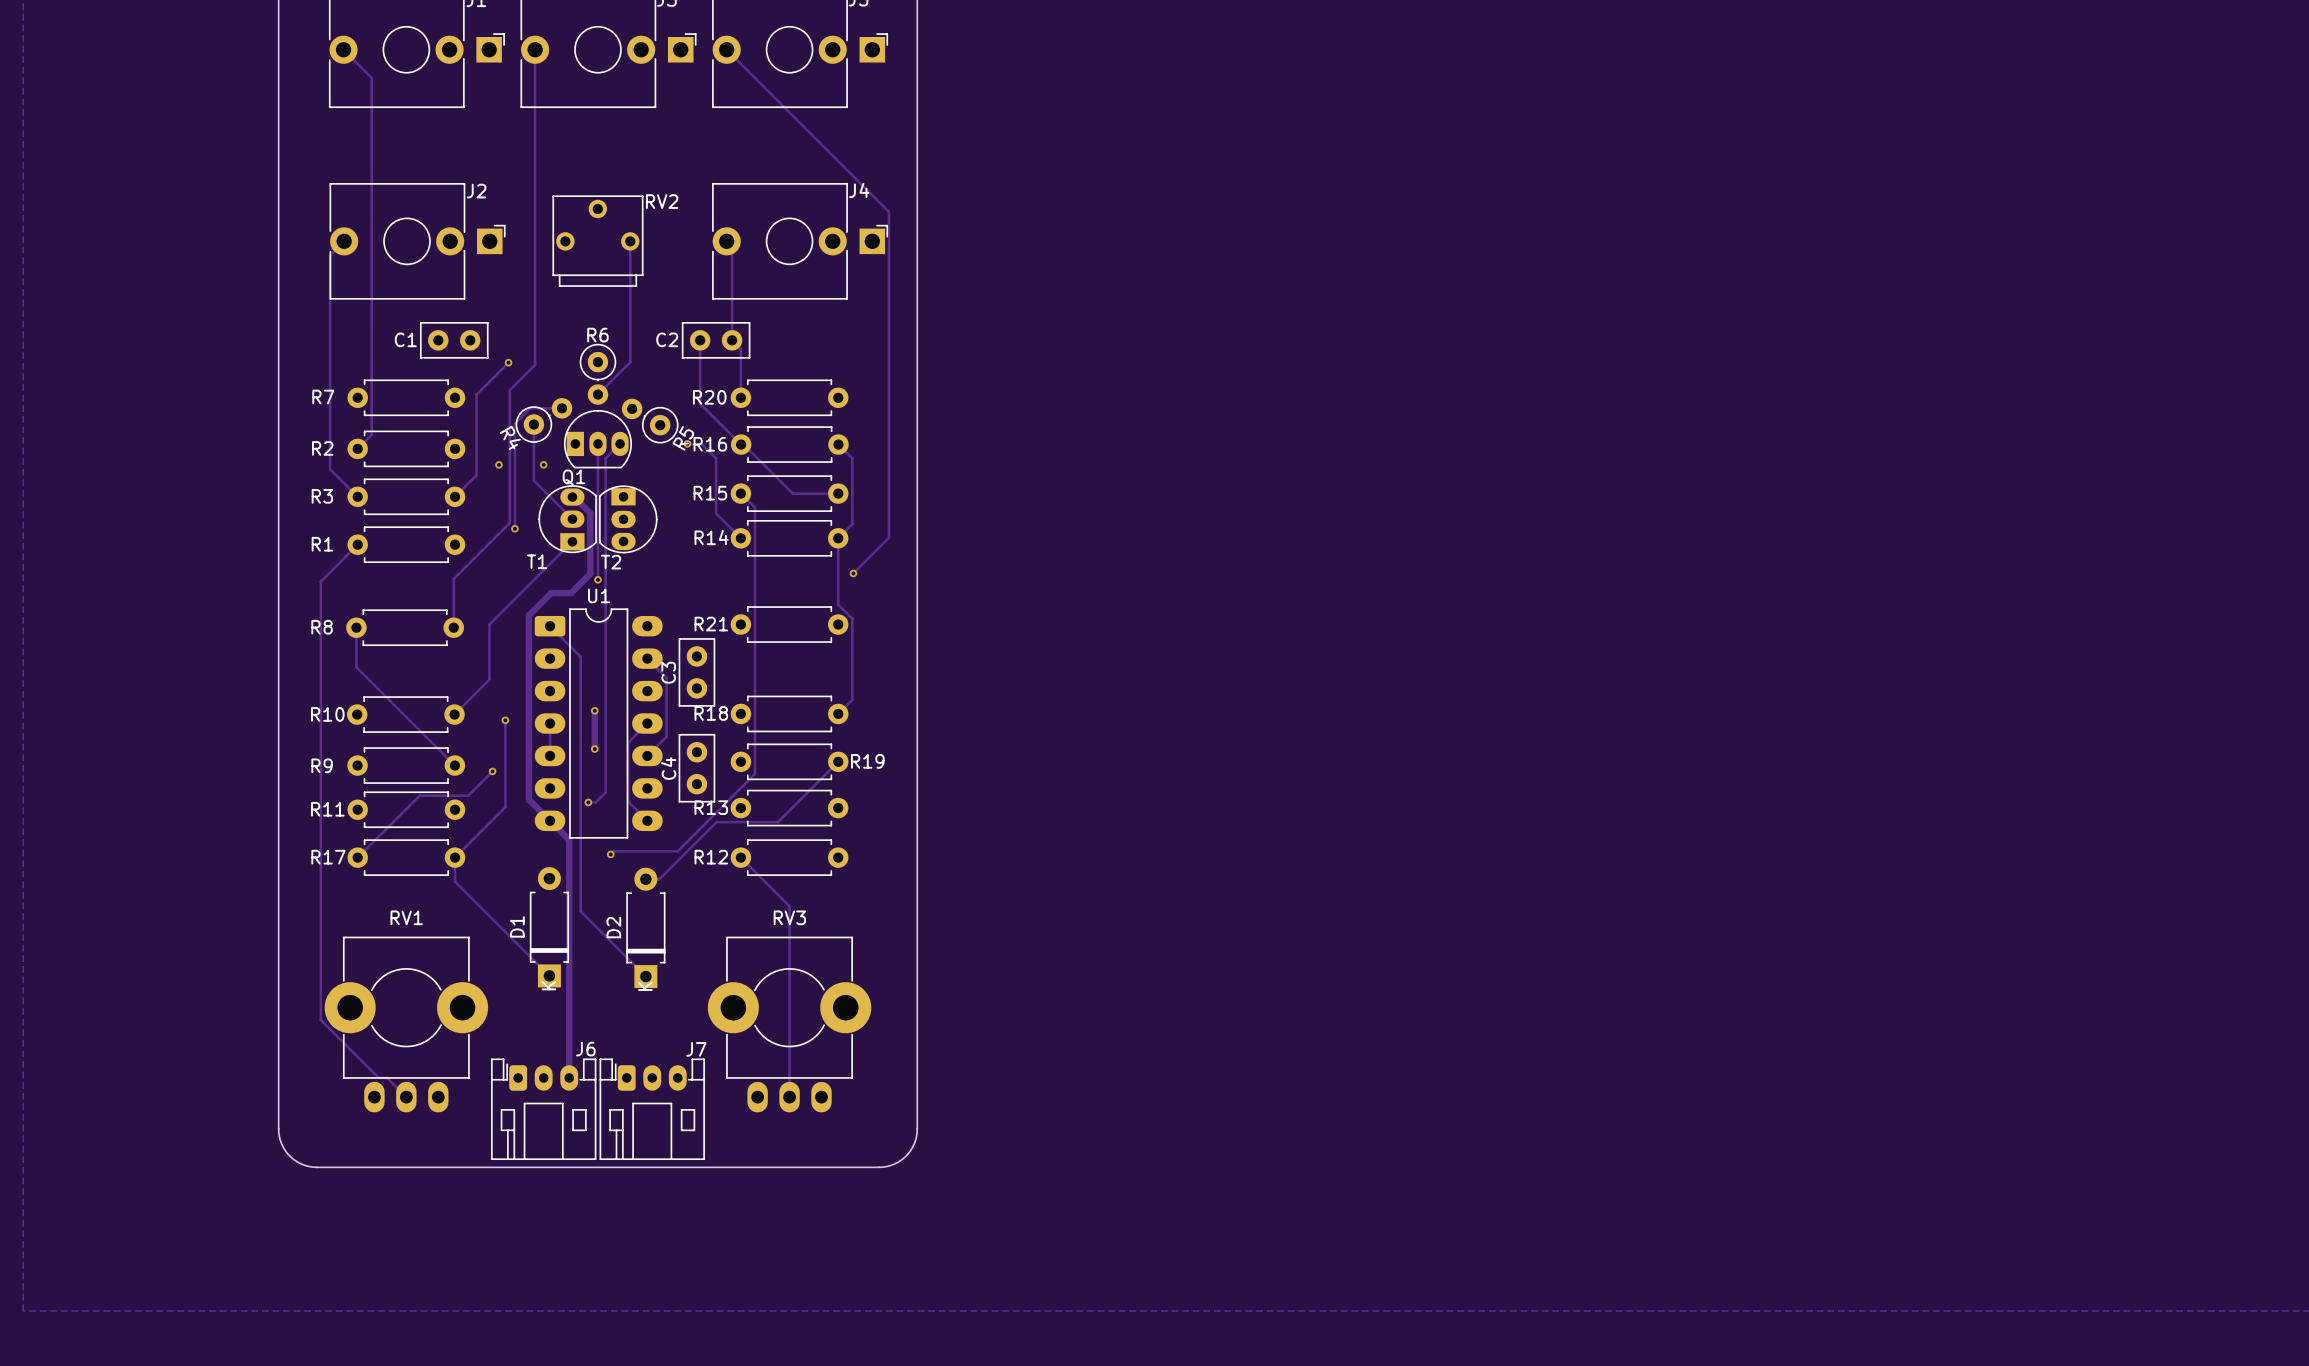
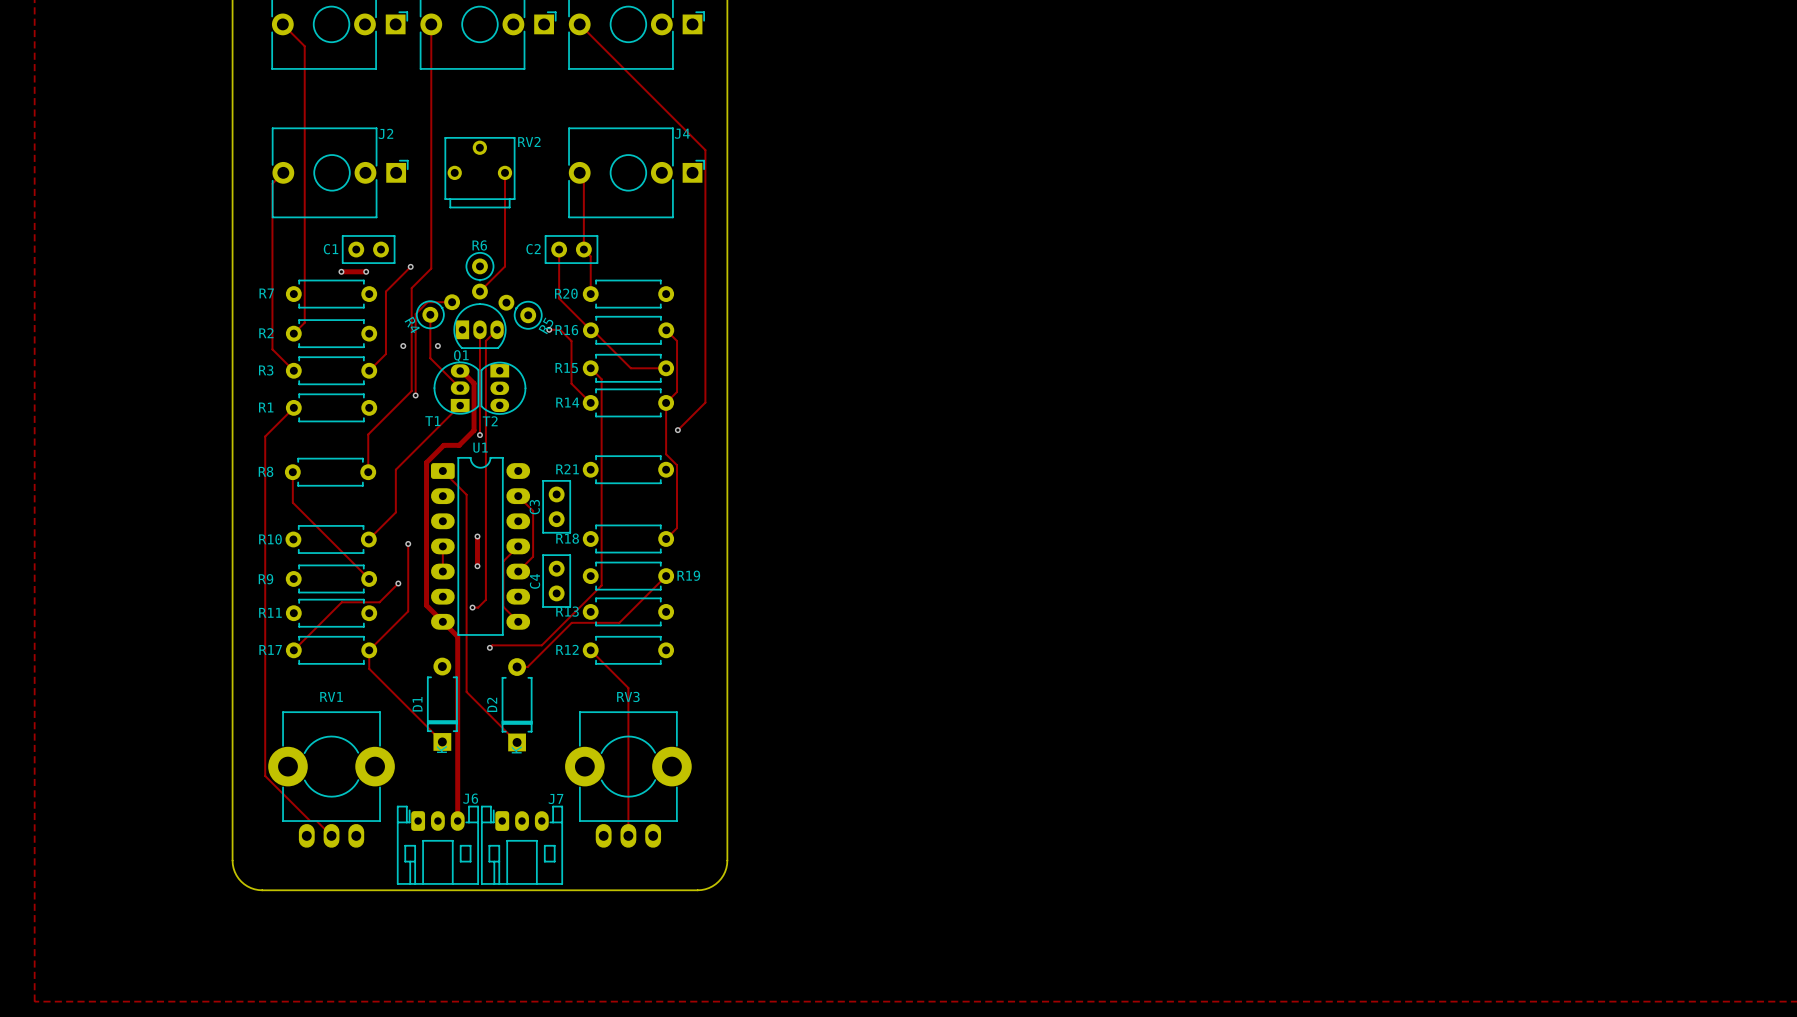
track: none -> (341, 271) (366, 271)
via: none -> (341, 271)
via: none -> (366, 271)

